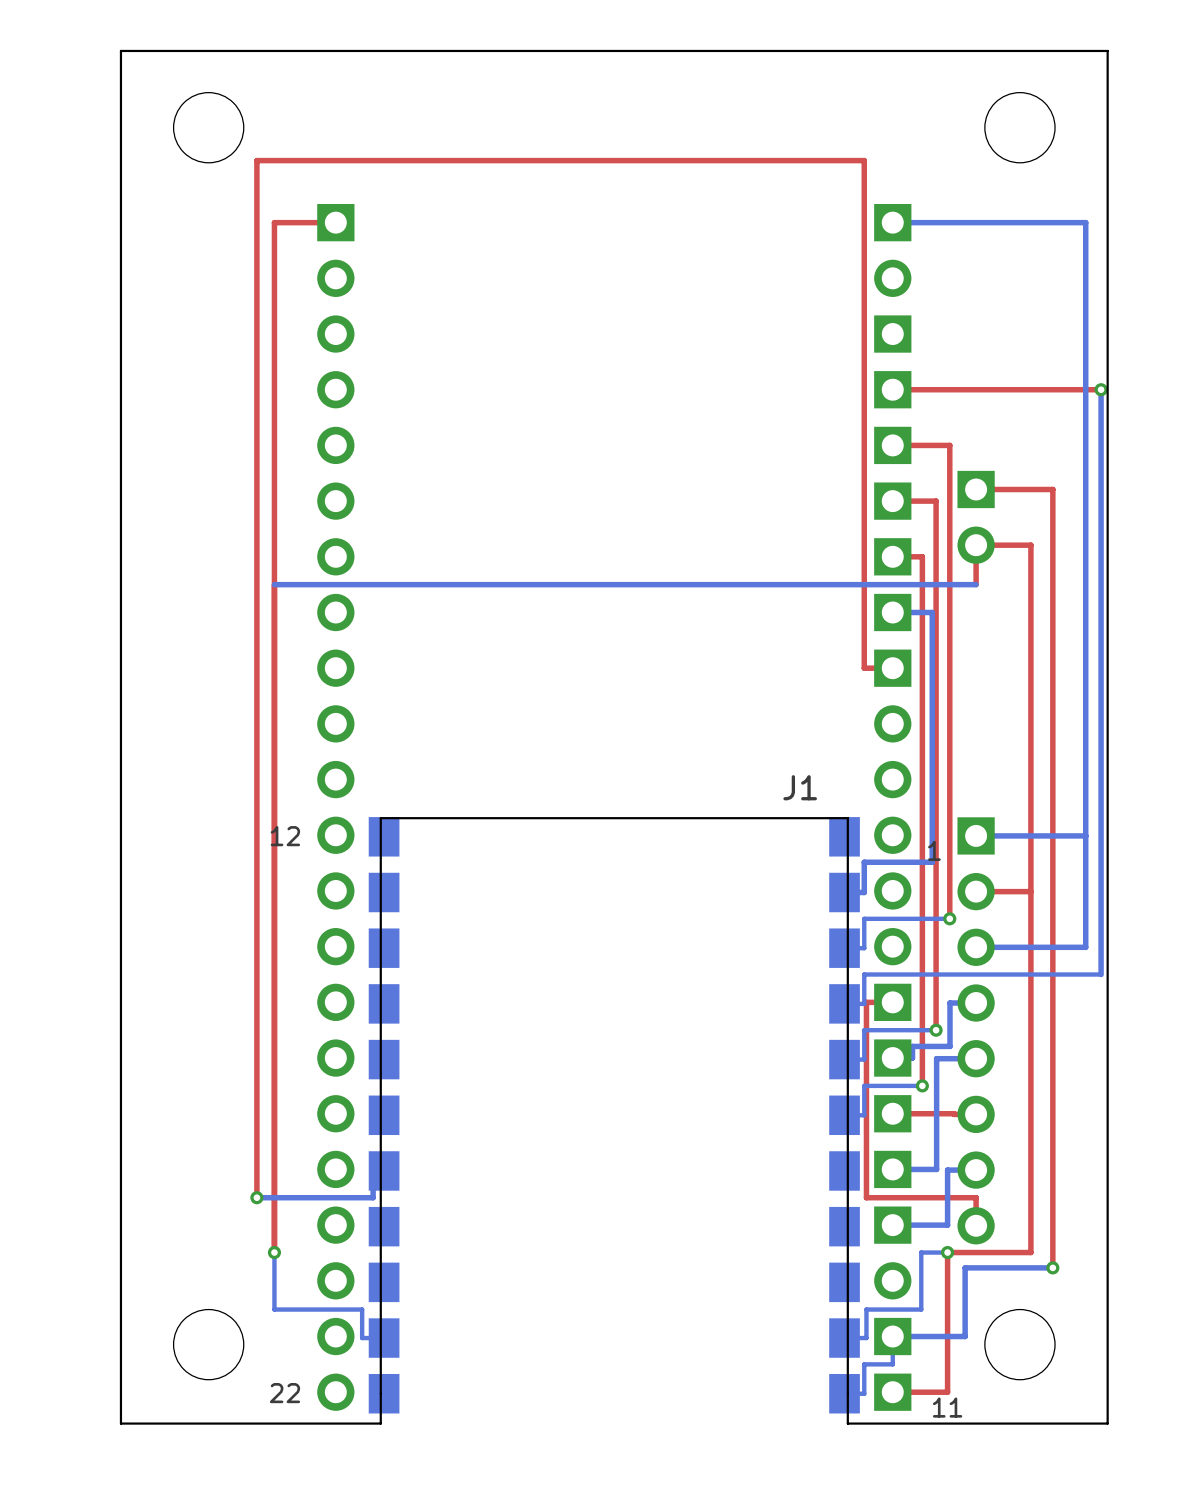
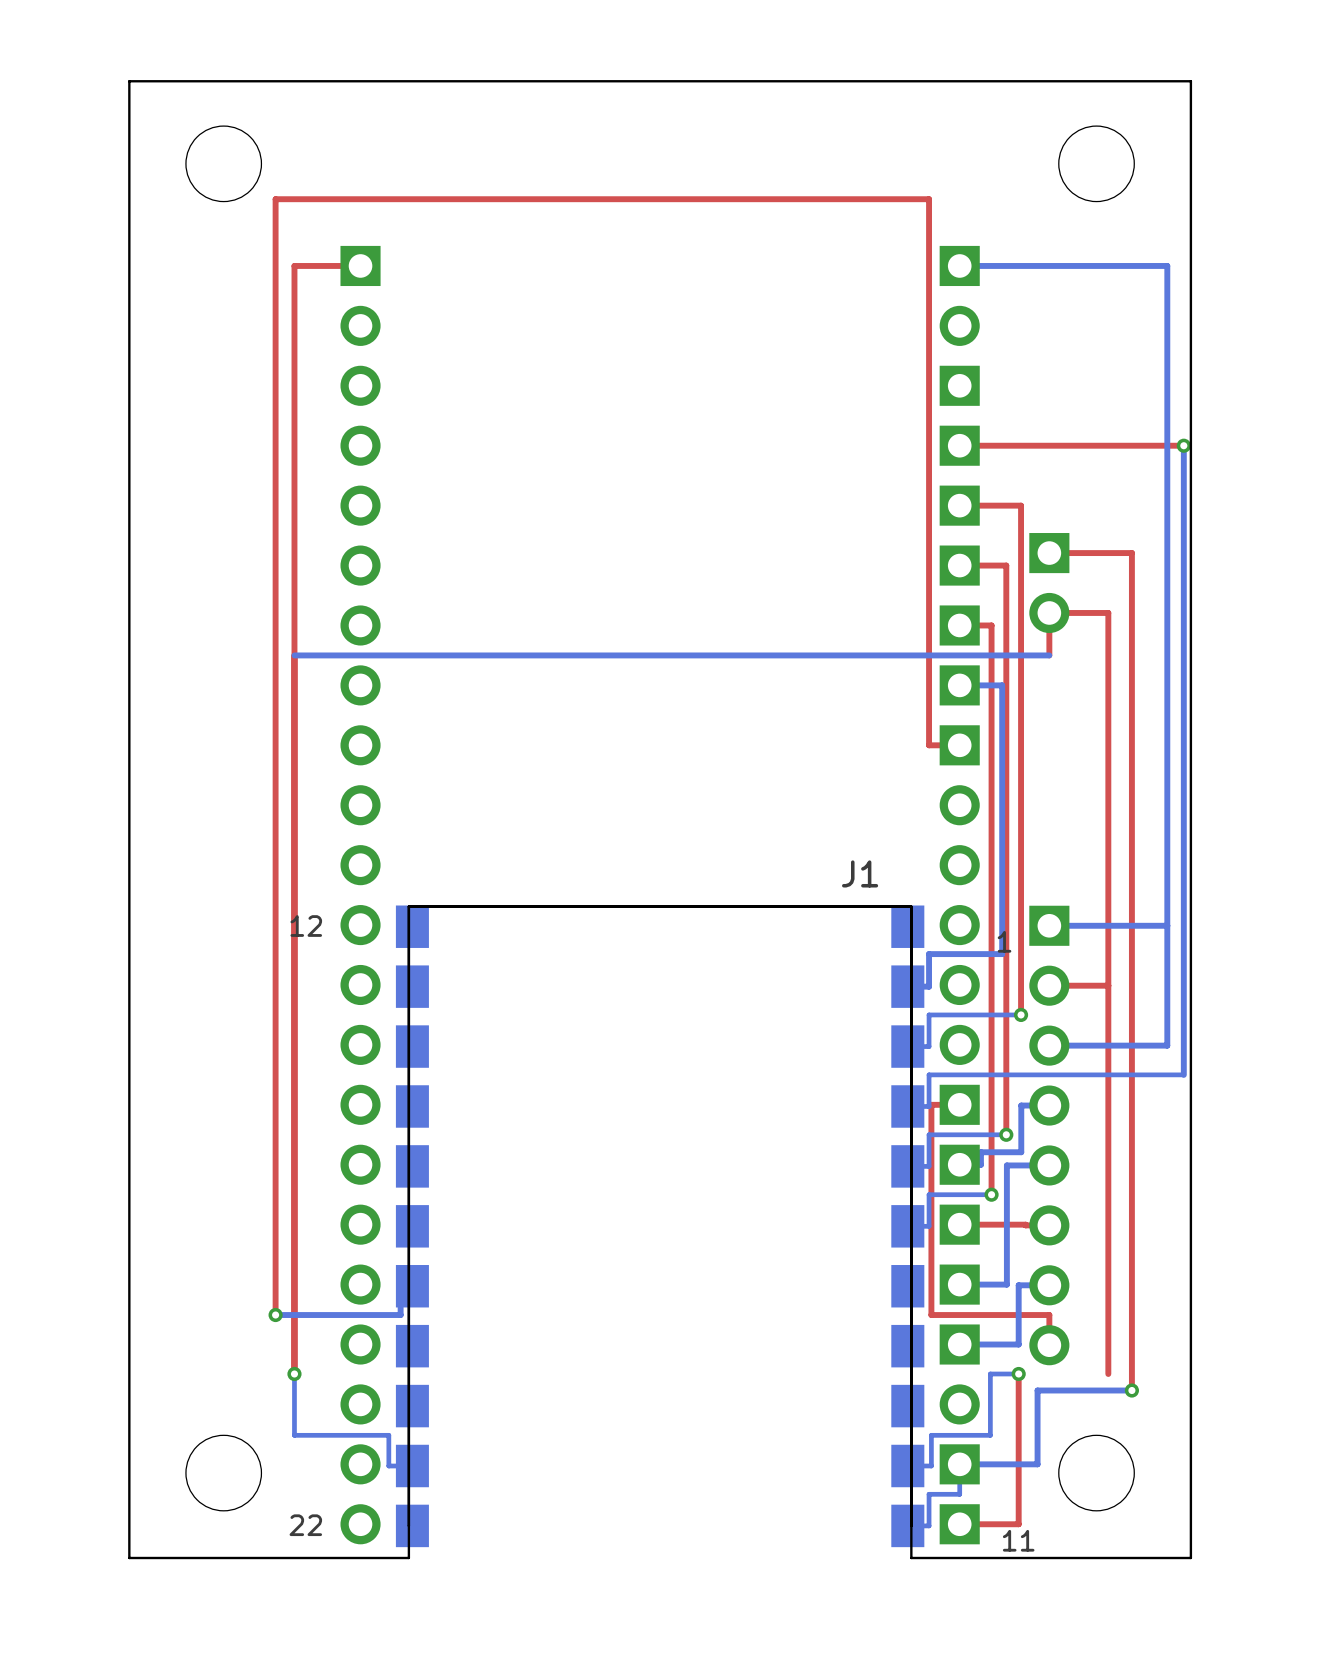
J1 footprint: [368, 817, 860, 1414] -> [395, 905, 925, 1548]
top track: (1030, 1252) (947, 1252) -> none

